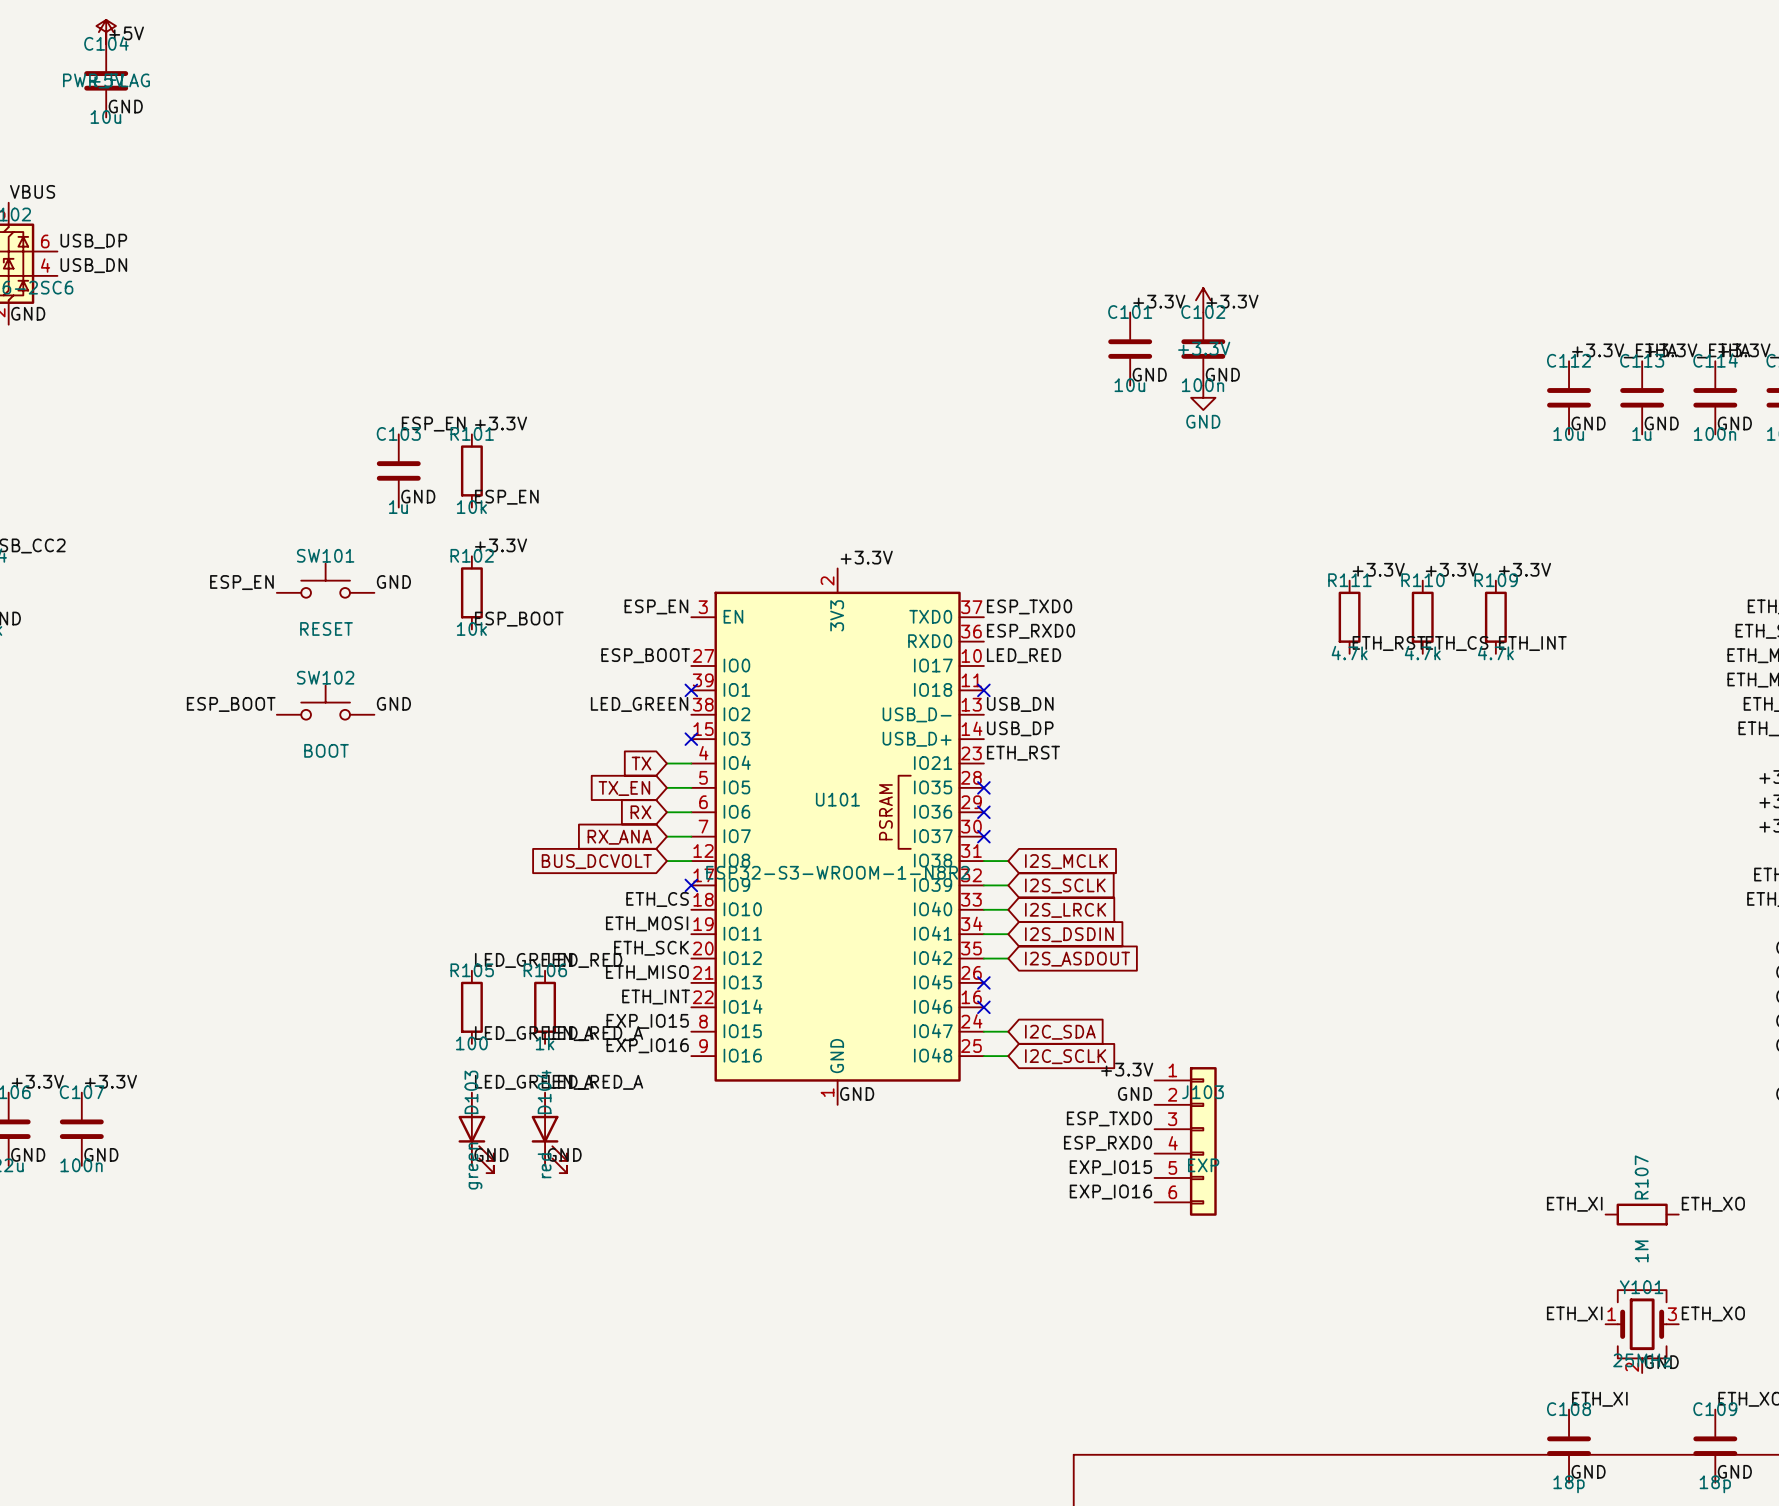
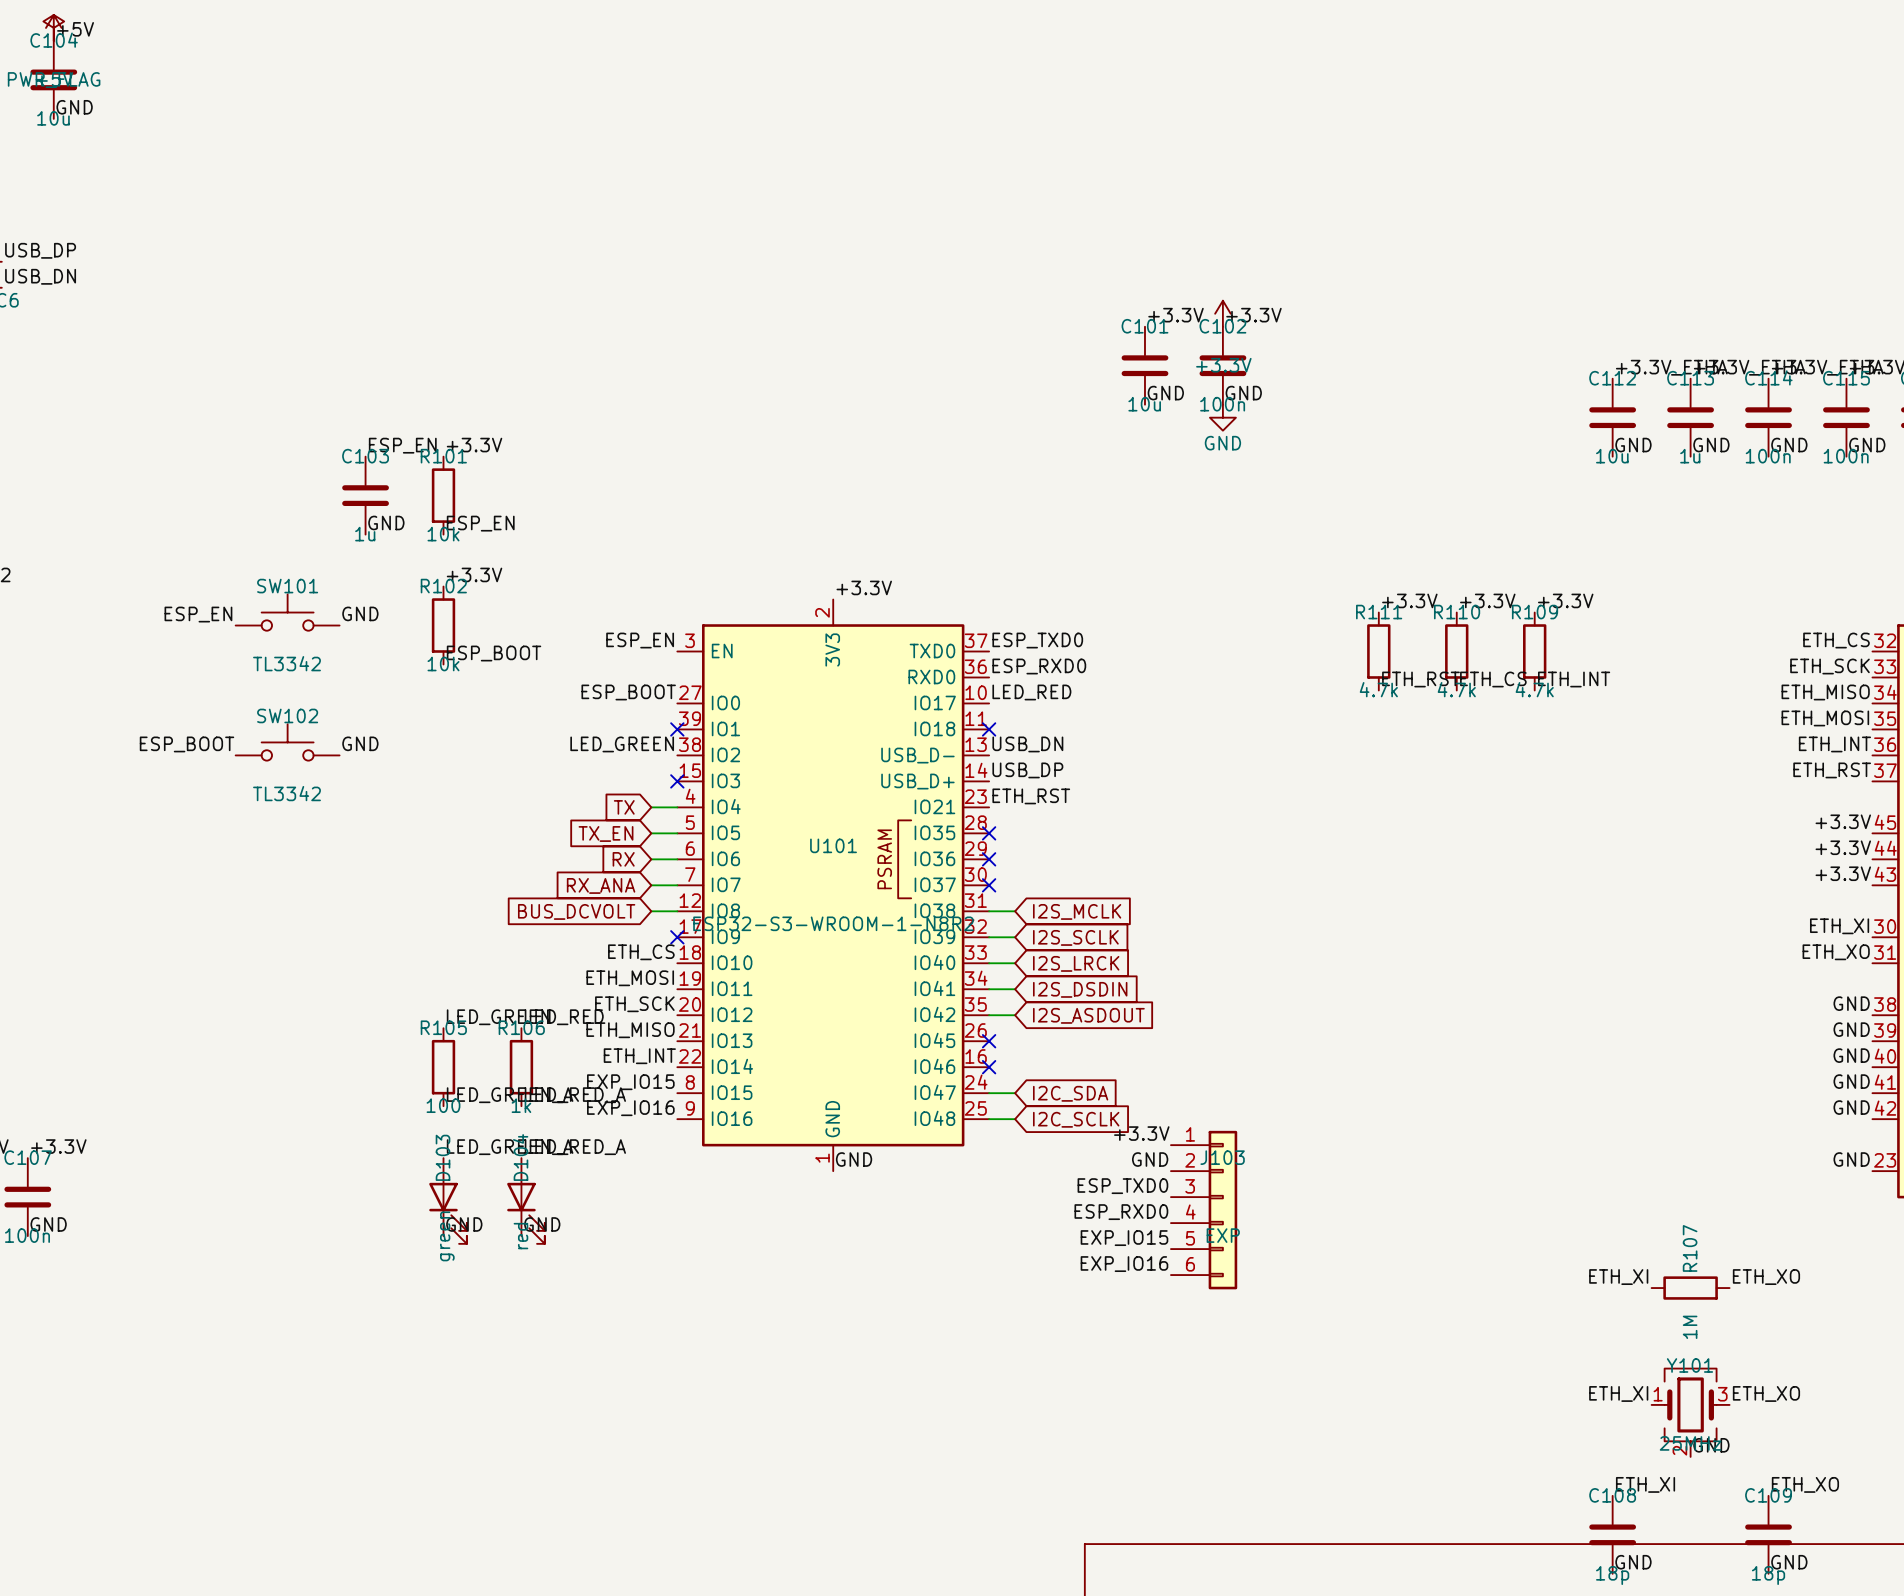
SW101 value: RESET (326, 628) -> TL3342 (286, 663)
SW102 value: BOOT (326, 750) -> TL3342 (286, 793)

